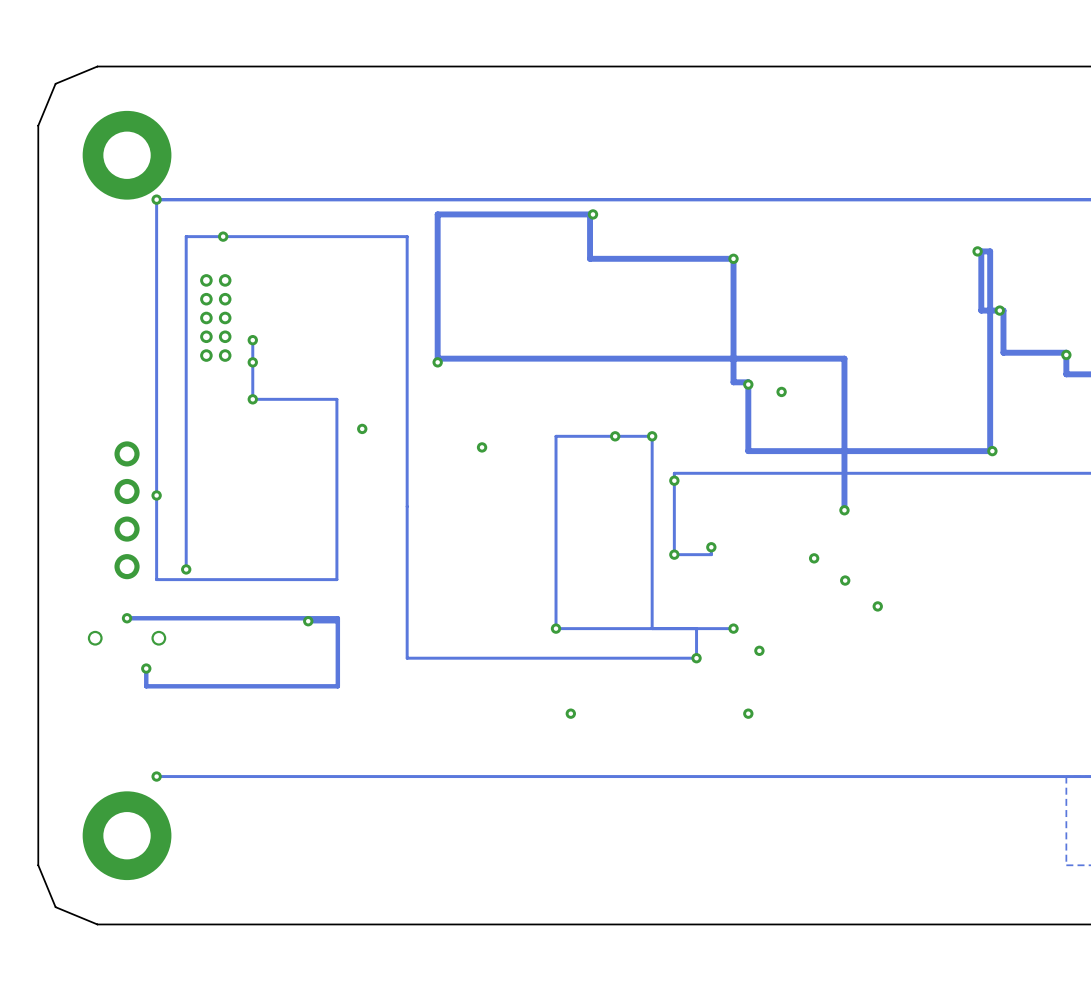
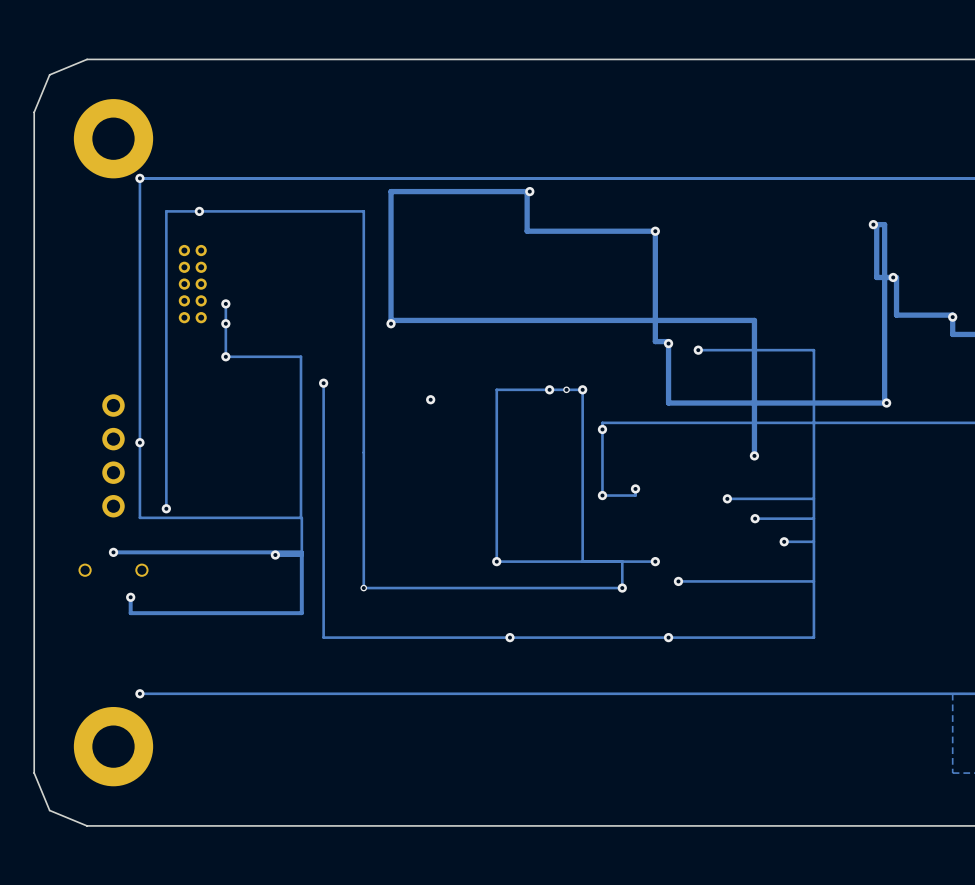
track: none -> (698, 350) (813, 350) (813, 637) (323, 637) (323, 383)
via: none -> (566, 389)
track: none -> (813, 498) (727, 498)
track: none -> (301, 517) (301, 552)
track: none -> (813, 518) (755, 518)
track: none -> (813, 541) (784, 541)
track: none -> (813, 581) (678, 581)
via: none -> (363, 588)

